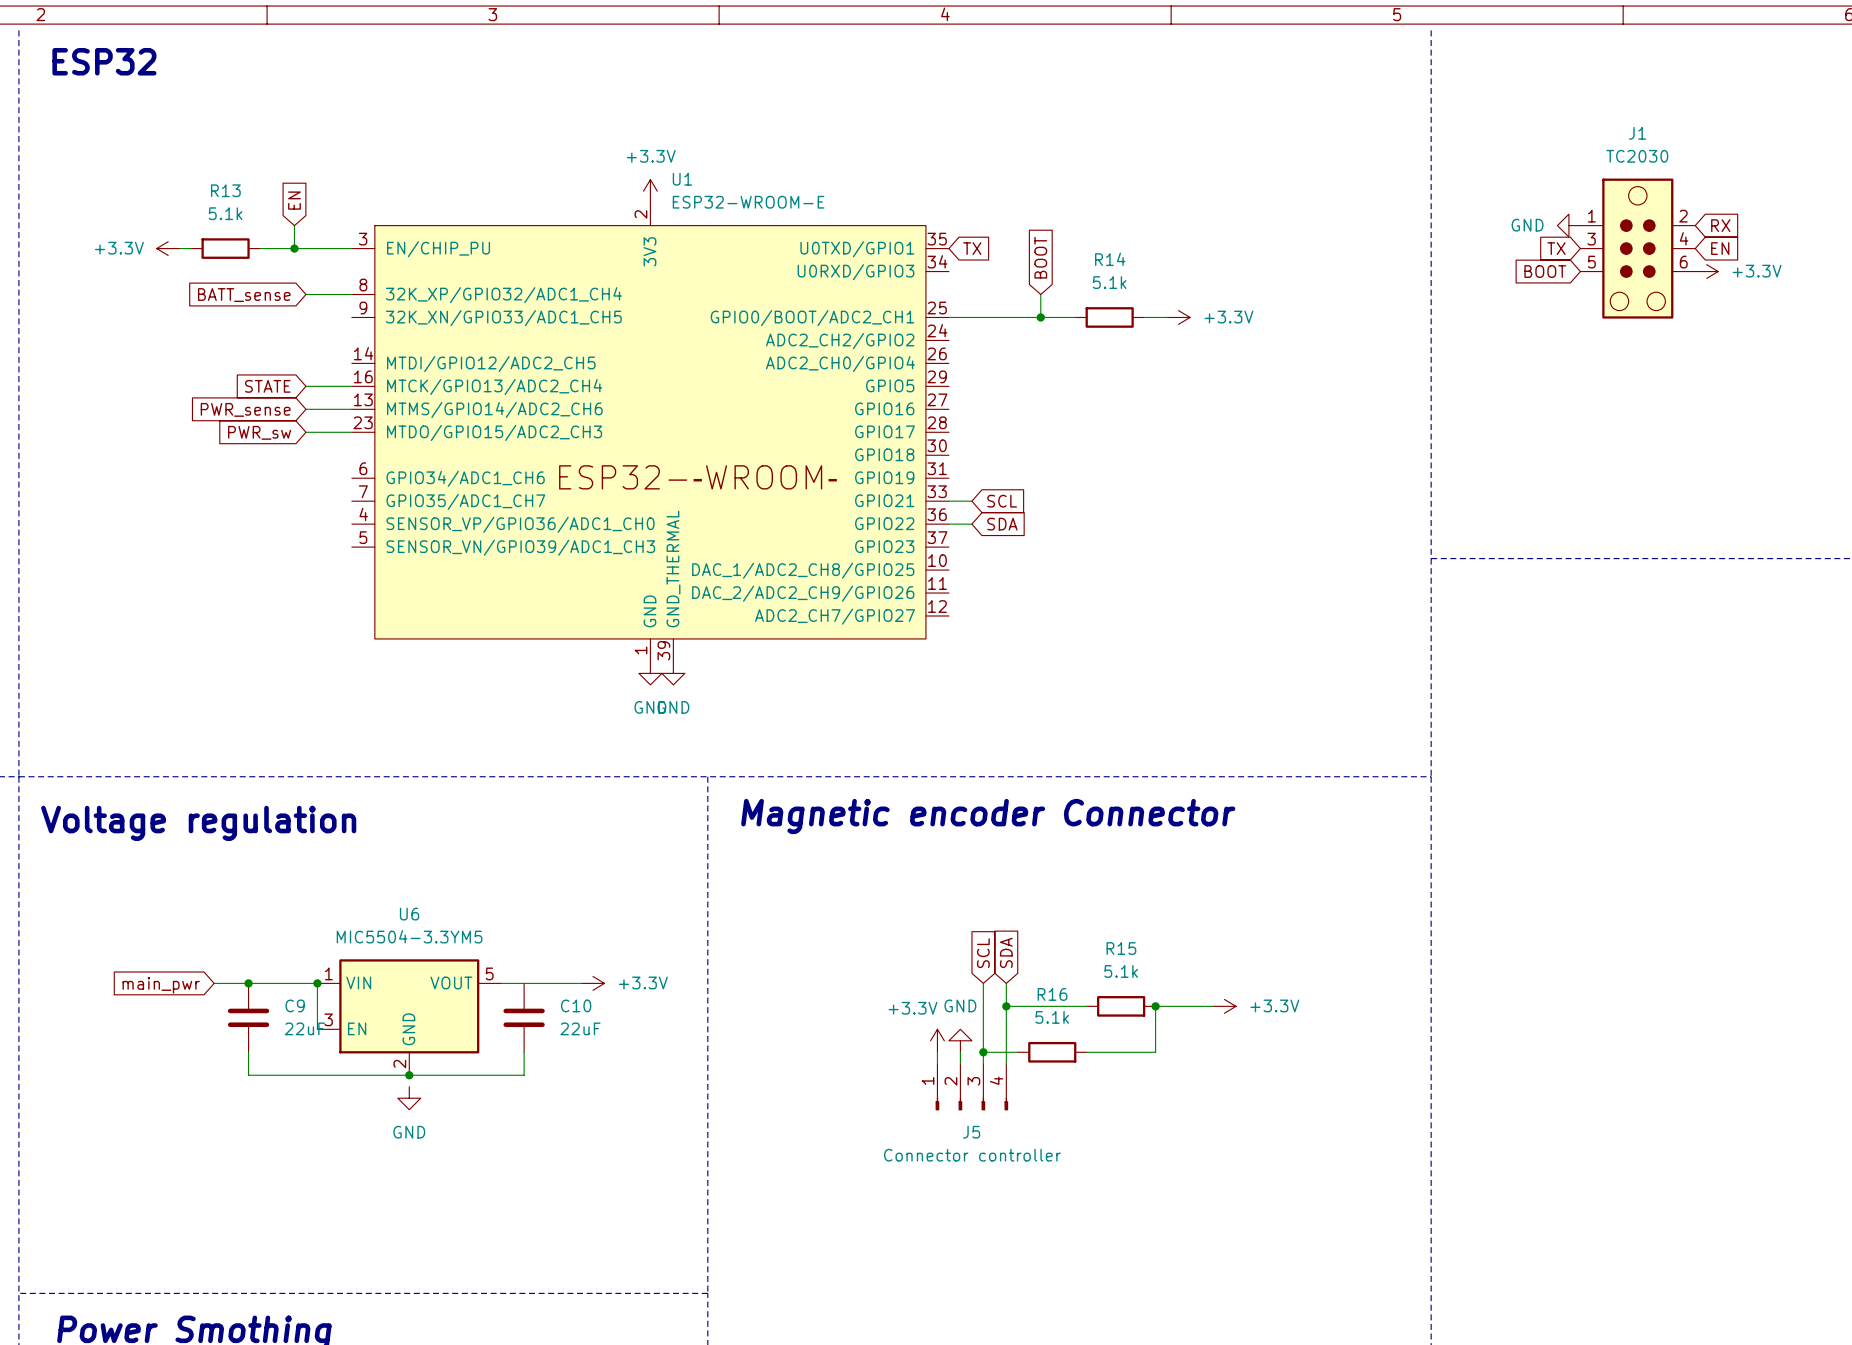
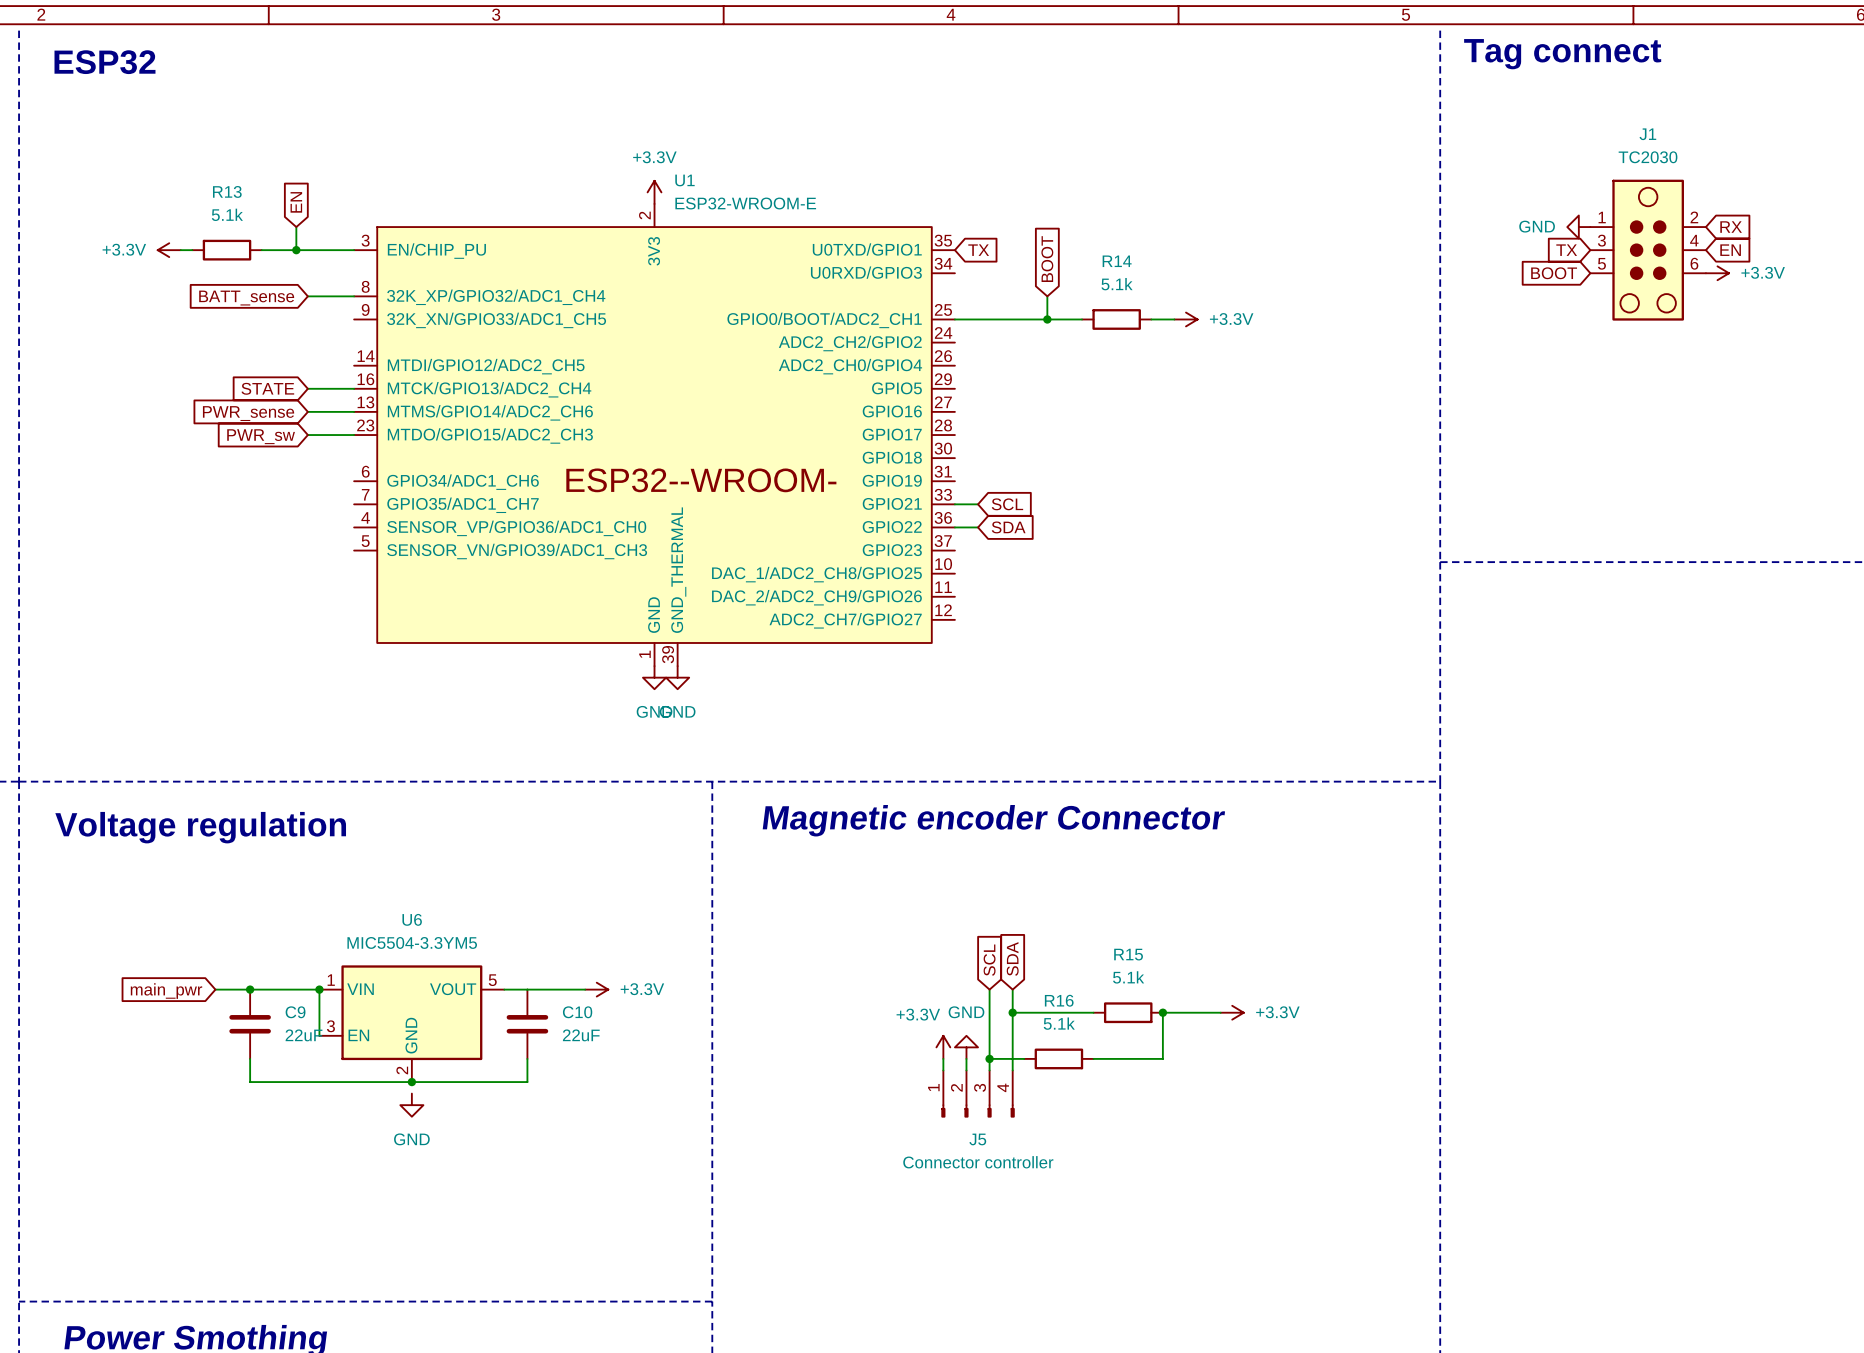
text: none -> Tag connect (1562, 54)

